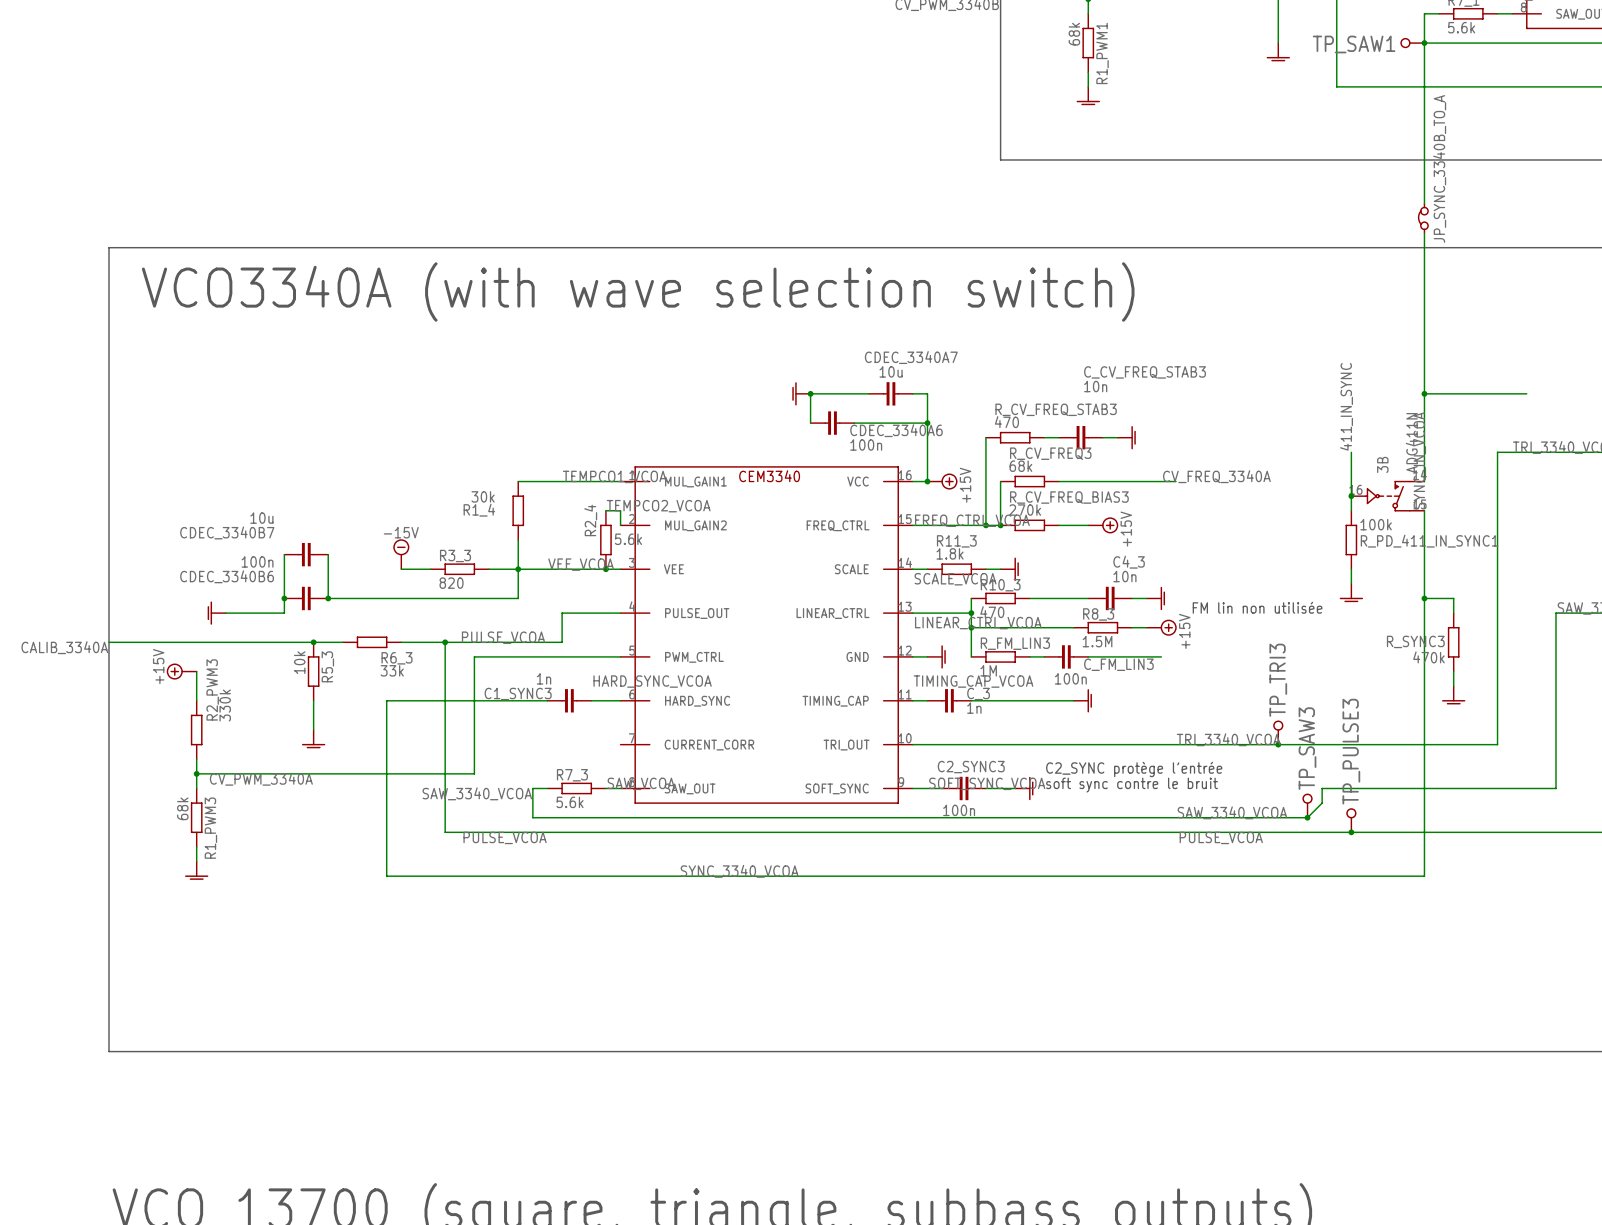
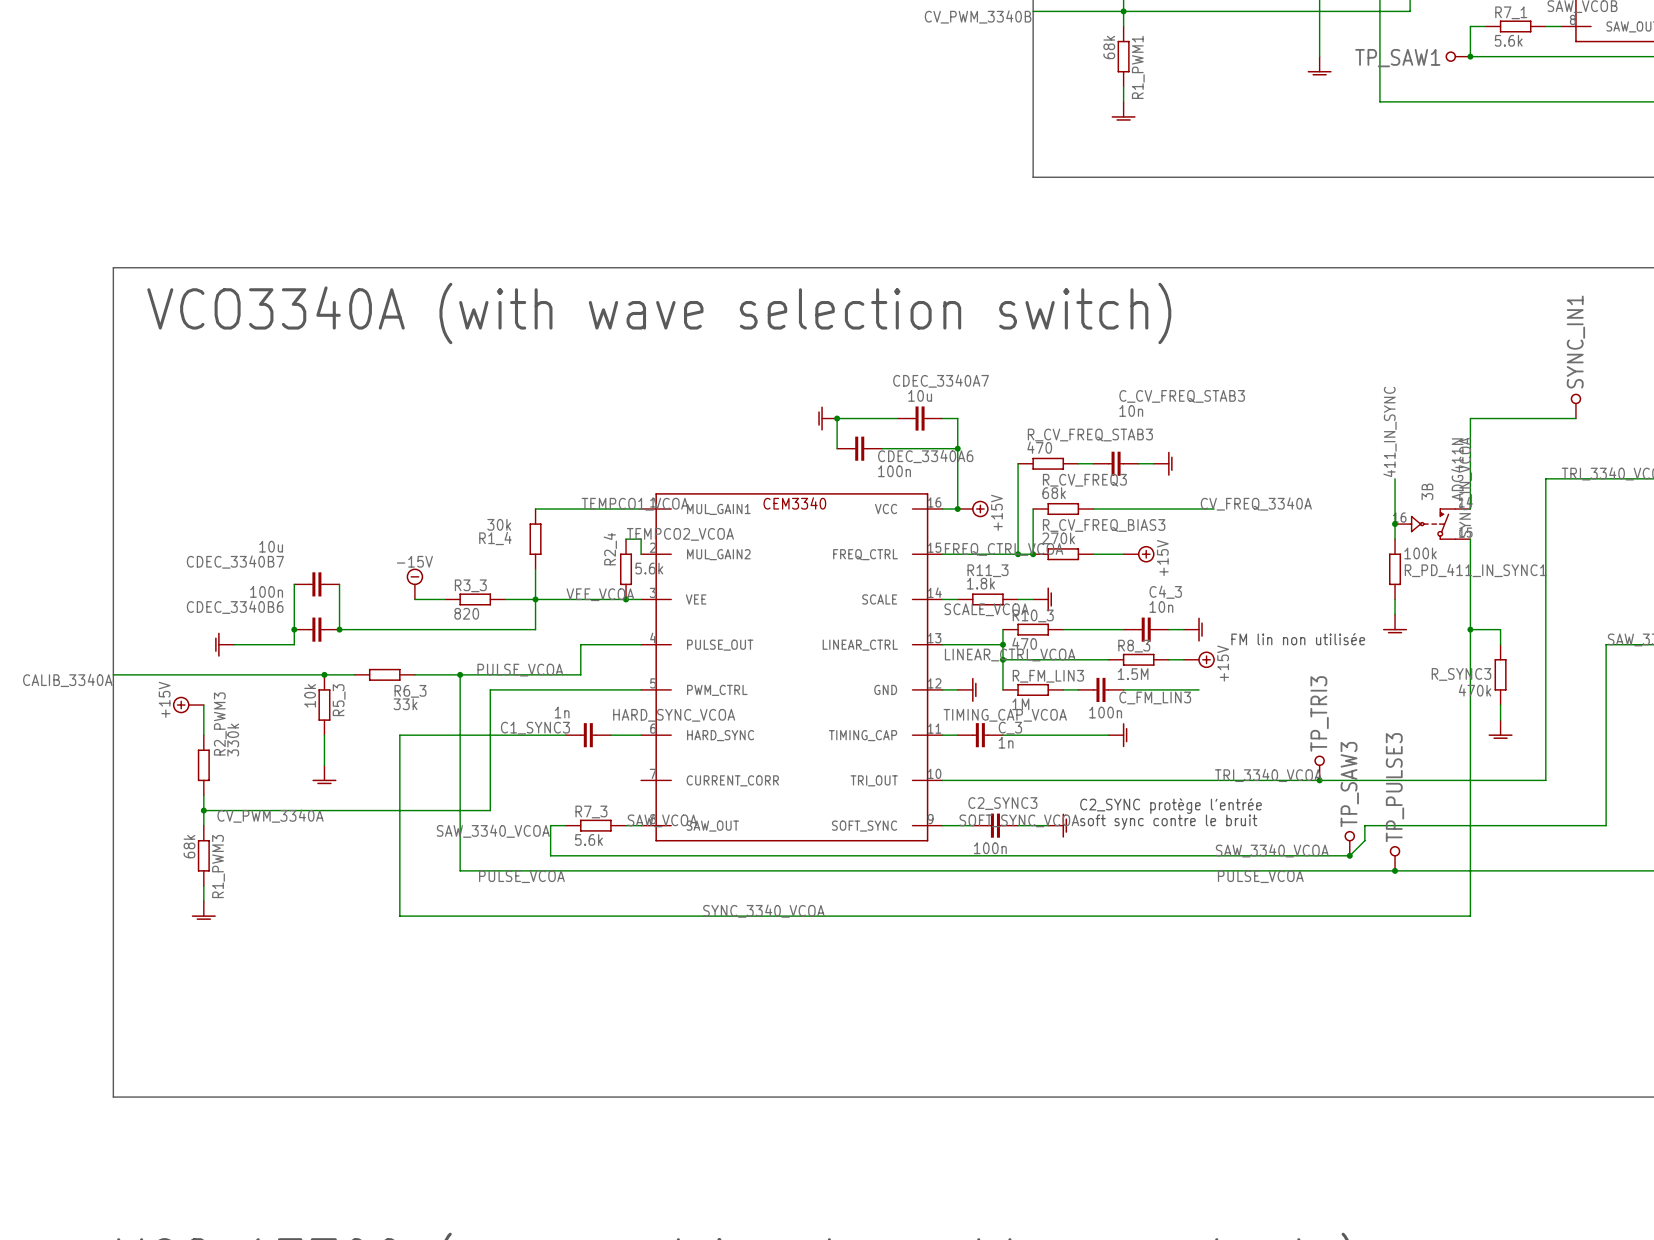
wire: (1424, 43) (1424, 203) -> none
JP_SYNC_3340B_TO_A: (1423, 218) -> none
wire: (1424, 233) (1424, 393) -> none
SYNC_IN1: none -> (1575, 406)
junction: (1424, 393) -> none

